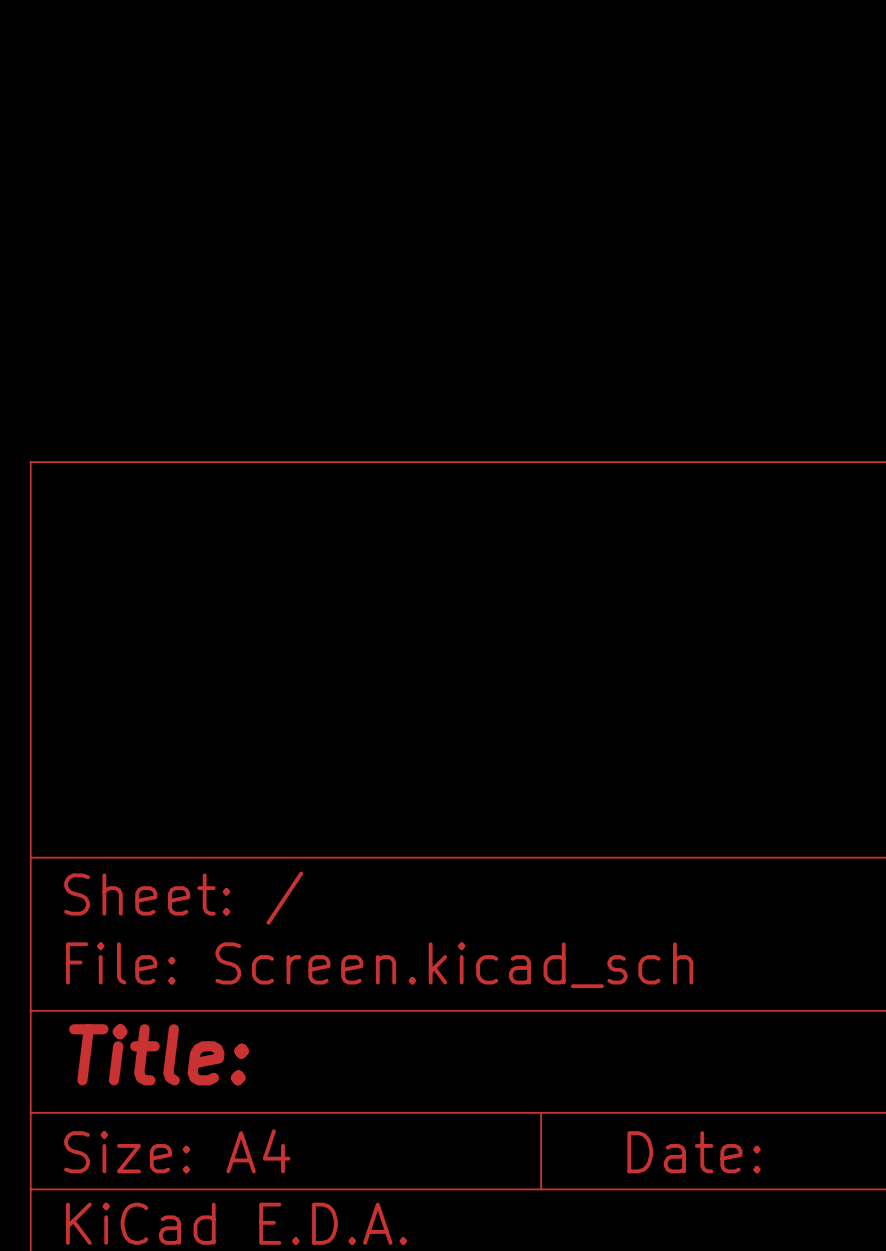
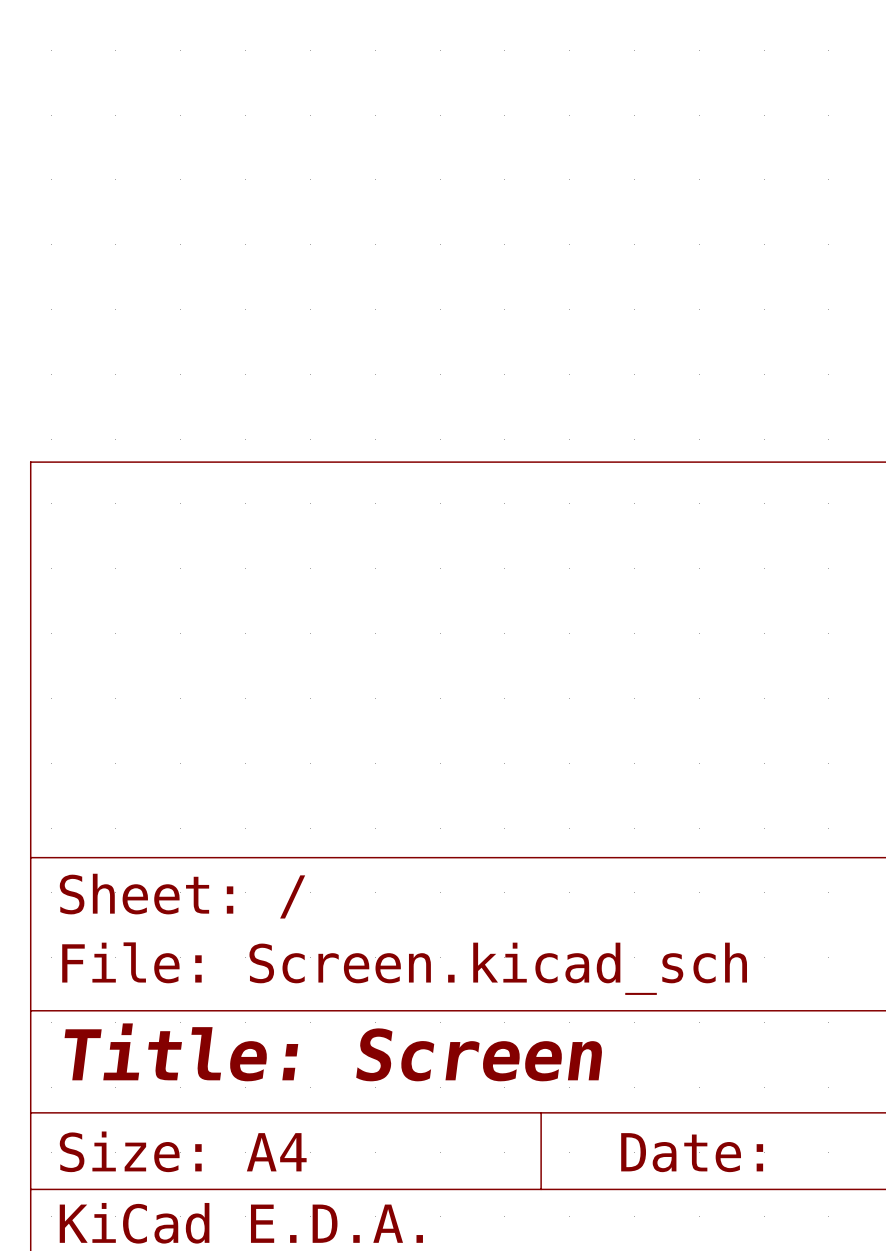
title block: Title: (159, 1054) -> Title: Screen (333, 1052)

